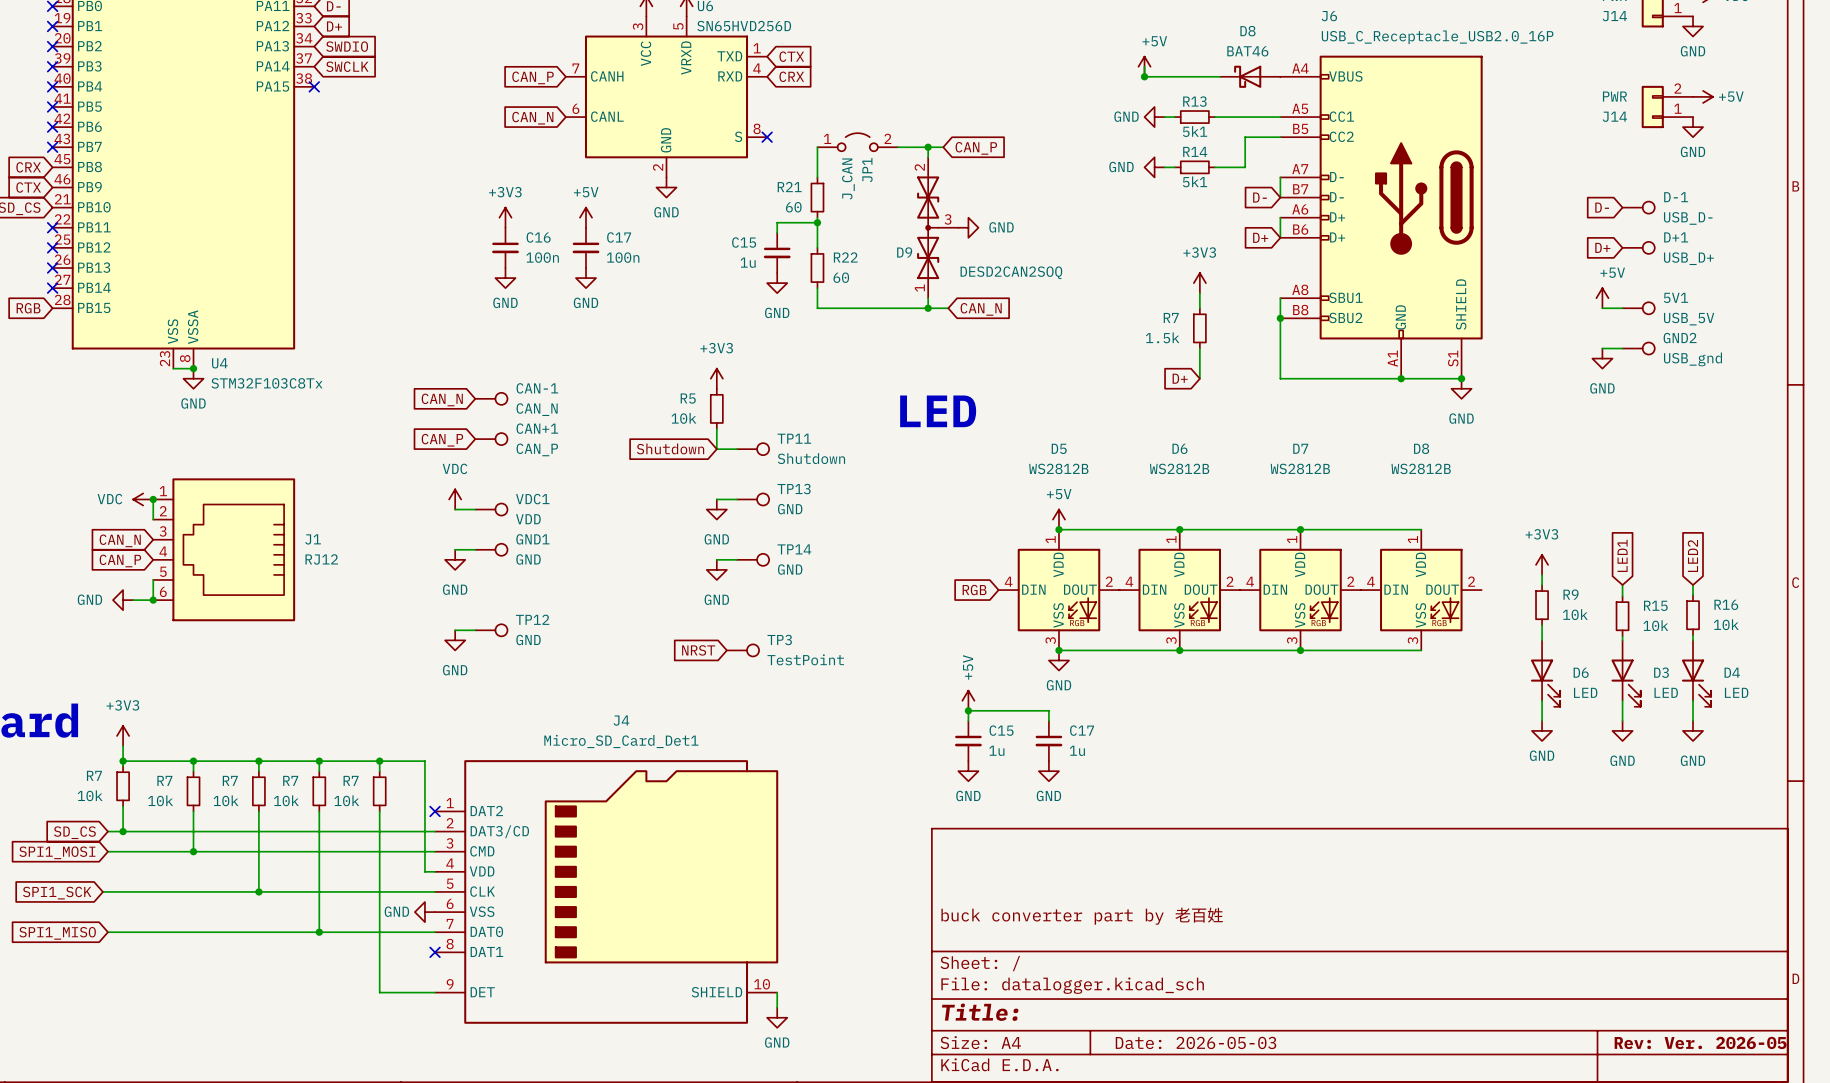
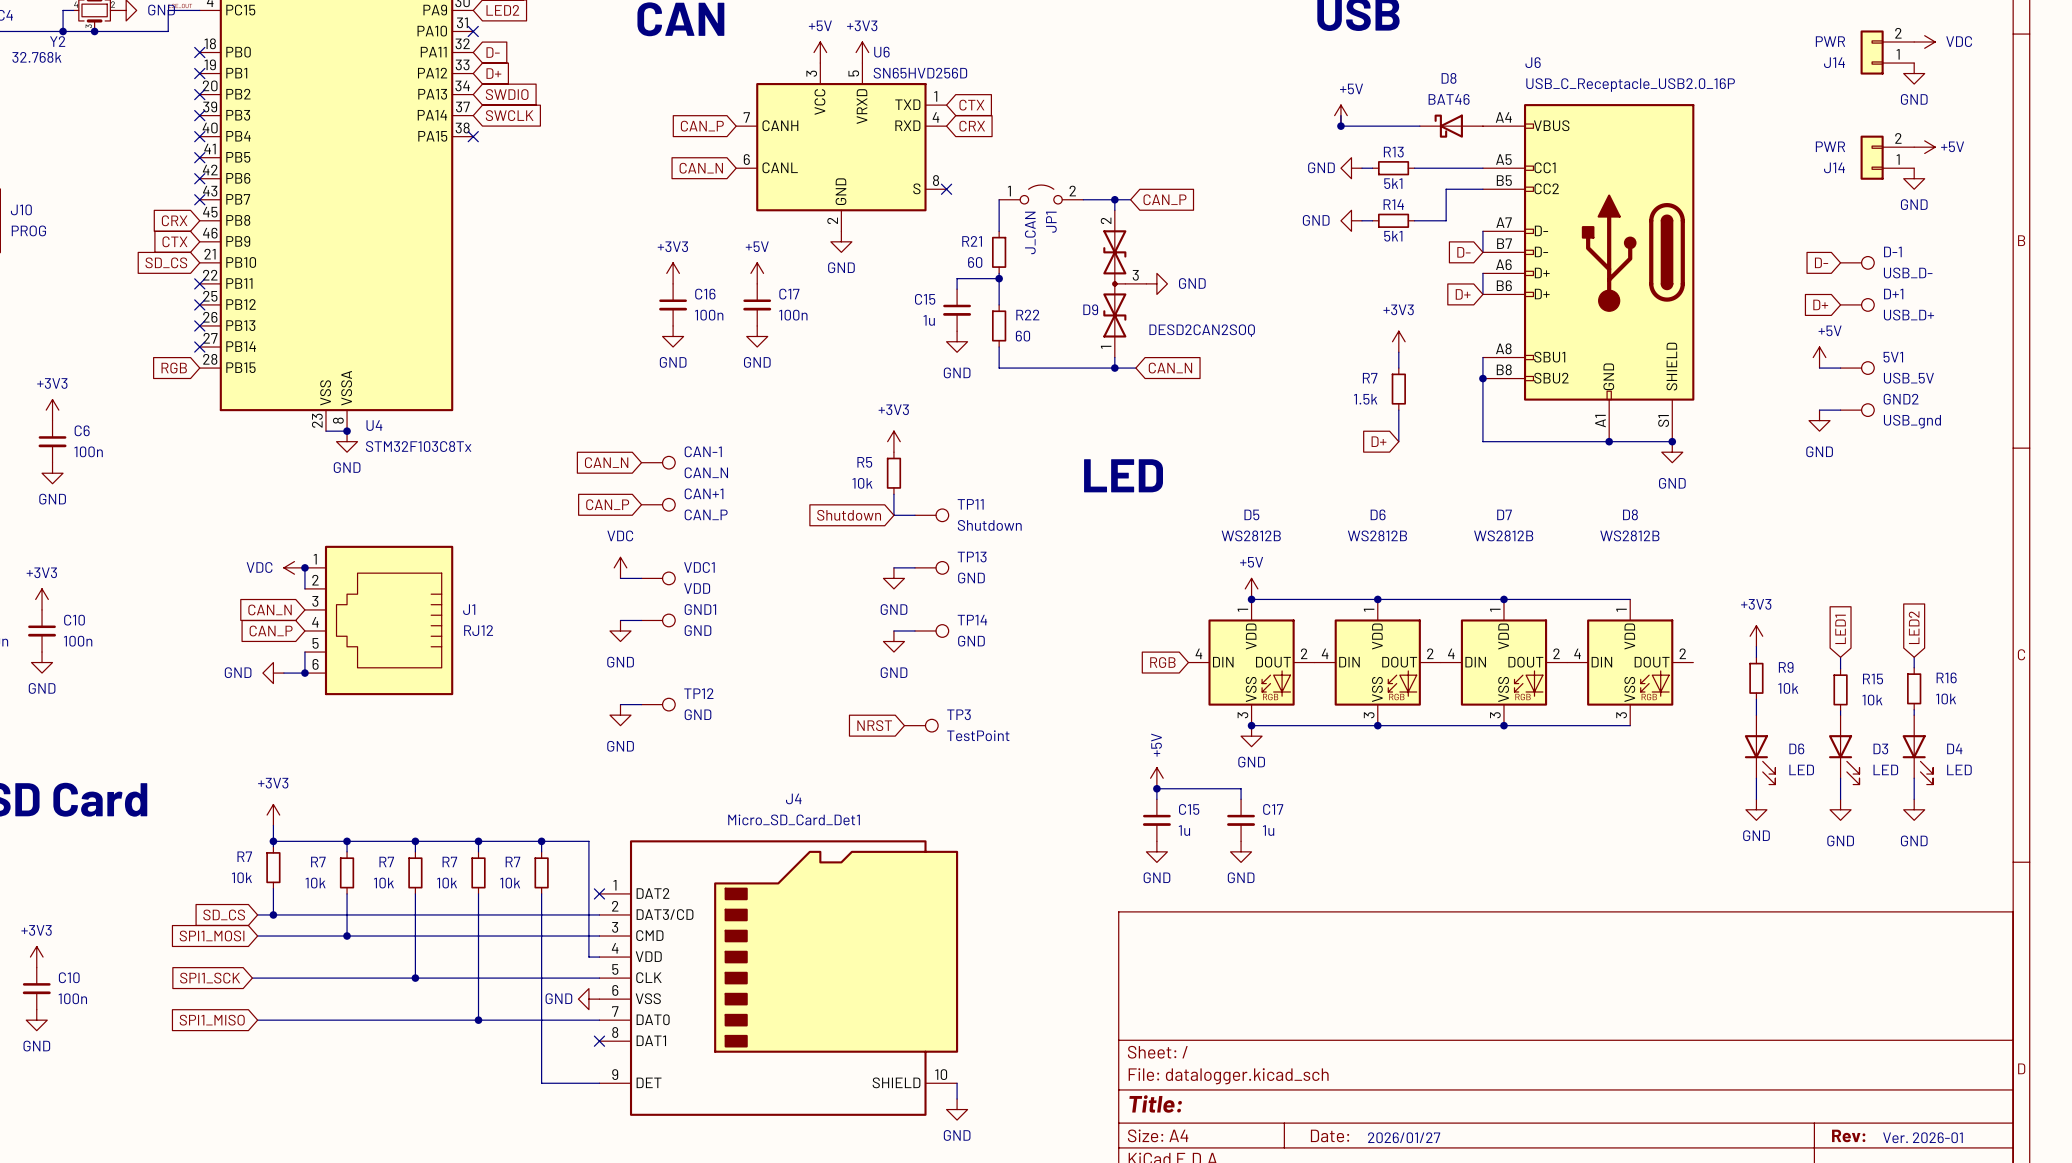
title block: buck converter part by 老百姓 (1082, 916) -> none
title block: Date: 2026-05-03 (1195, 1042) -> Date: (1330, 1135)
title block: Rev: Ver. 2026-05 (1700, 1042) -> Rev: (1848, 1135)
text: none -> Ver. 2026-01 (1922, 1137)
text: none -> 2026/01/27 (1404, 1137)

